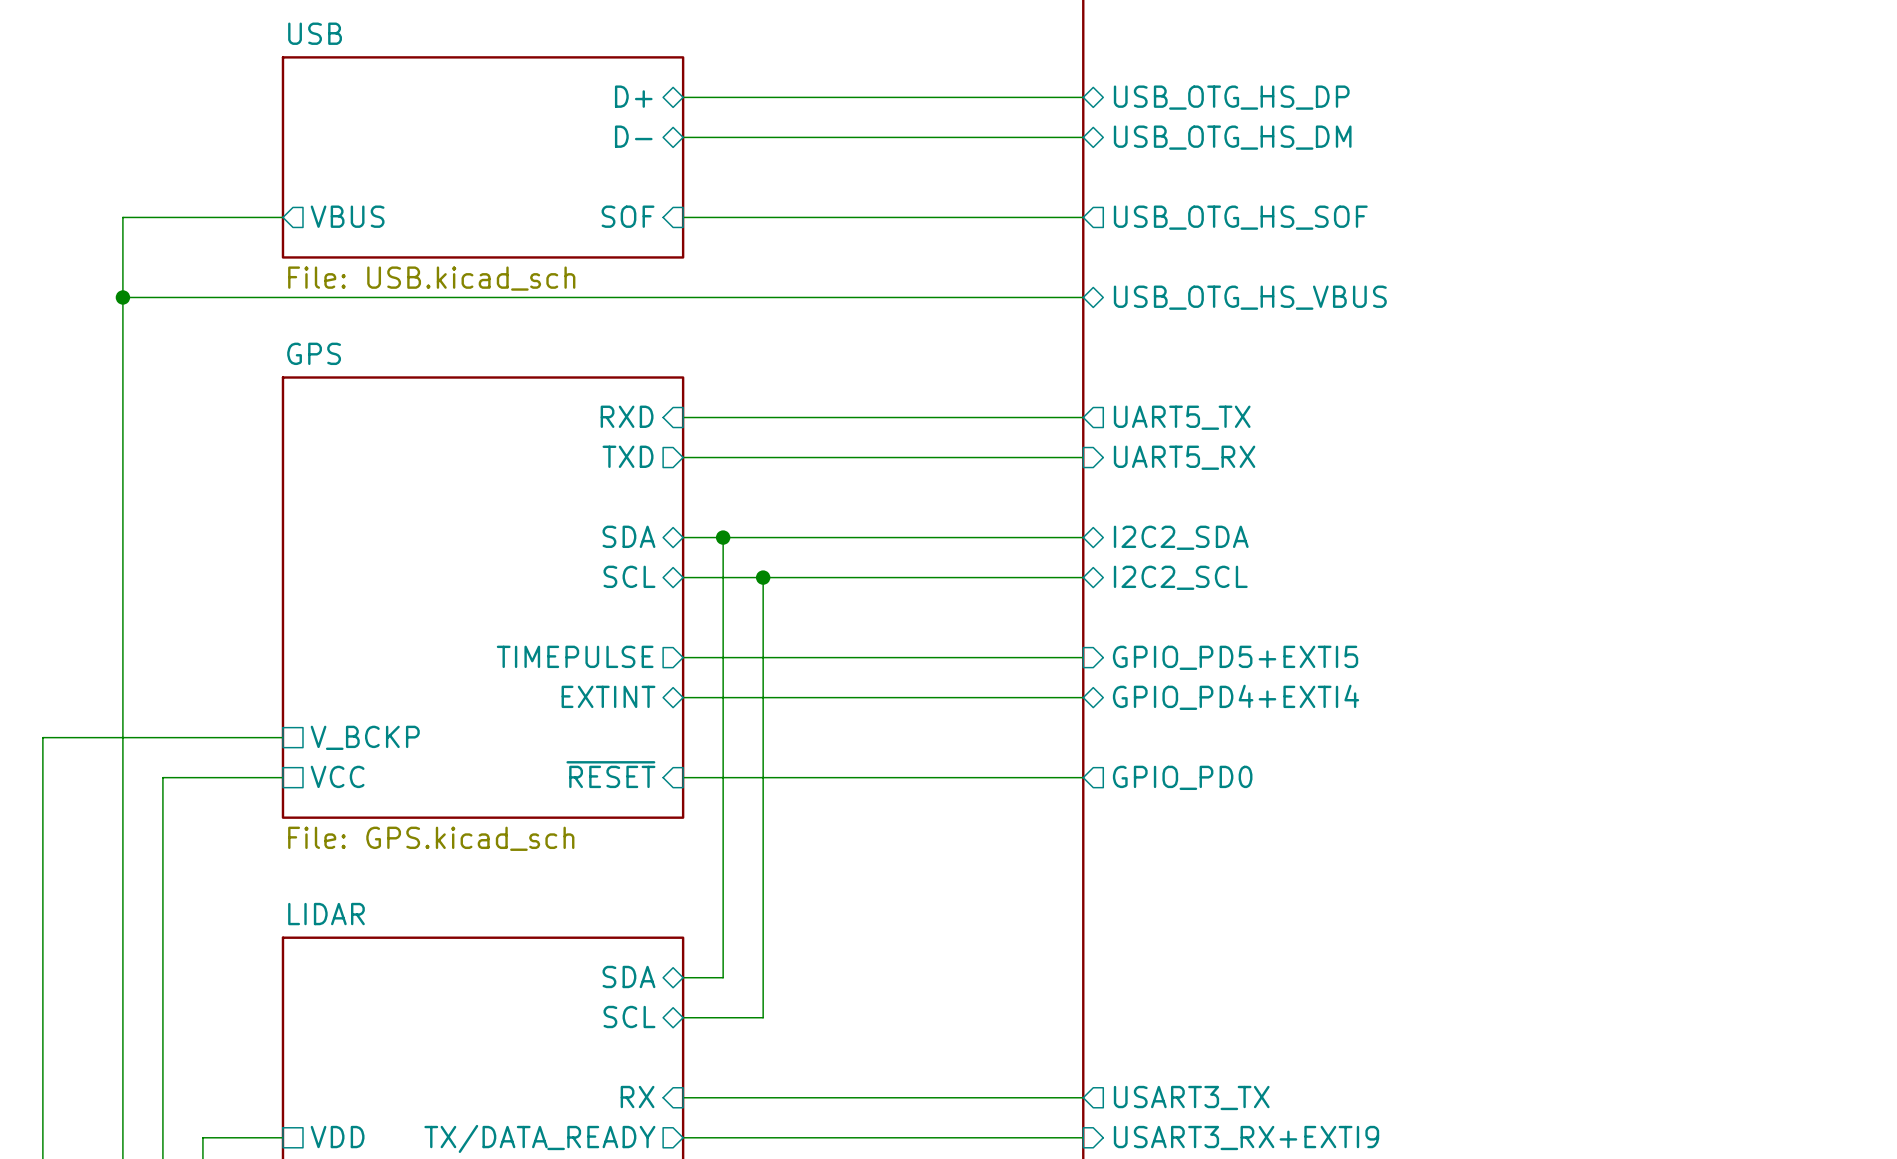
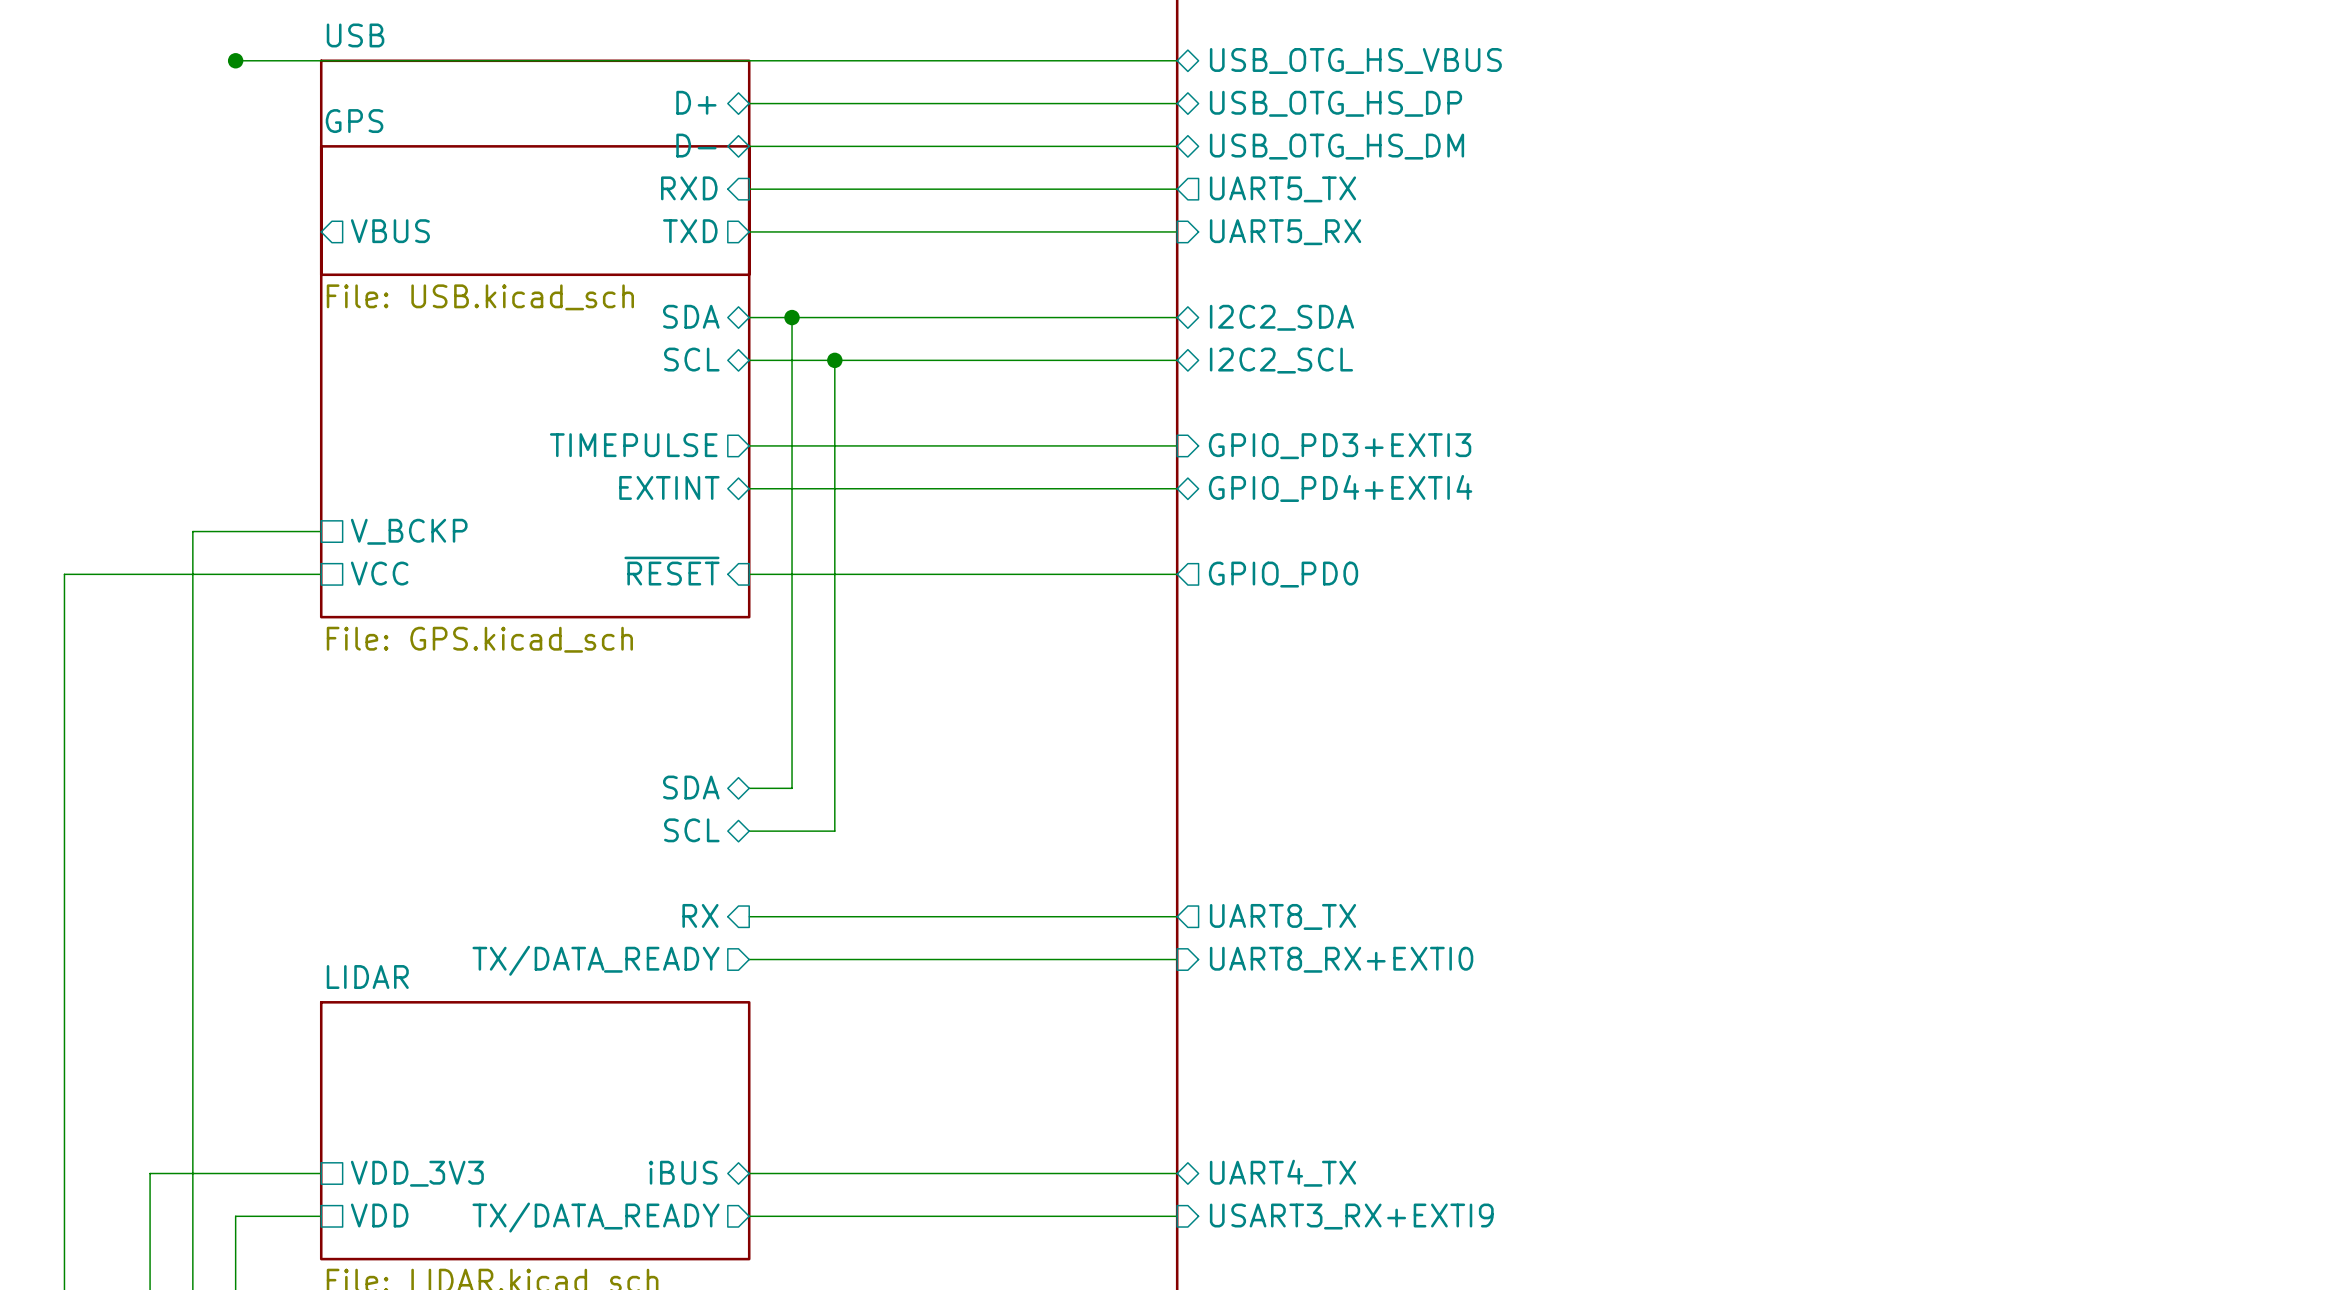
wire: none -> (235, 60) (1177, 60)
junction: none -> (235, 60)
sheet pin: none -> USB_OTG_HS_VBUS (1355, 60)
sheet pin: none -> RXD (689, 188)
wire: none -> (749, 189) (1177, 189)
sheet pin: none -> UART5_TX (1282, 189)
sheet pin shape: input (628, 216) -> output (690, 231)
sheet pin: SOF (628, 216) -> TXD (690, 231)
wire: (282, 217) (122, 217) (122, 1097) -> (321, 1173) (150, 1173)
sheet pin shape: output (1240, 217) -> input (1285, 232)
sheet pin: USB_OTG_HS_SOF (1240, 217) -> UART5_RX (1285, 232)
sheet pin: none -> SDA (691, 316)
wire: (122, 297) (683, 297) -> none
junction: (122, 297) -> none
wire: none -> (792, 317) (792, 574)
junction: none -> (792, 317)
sheet pin: USB_OTG_HS_VBUS (1250, 297) -> I2C2_SDA (1281, 317)
wire: none -> (834, 360) (834, 617)
junction: none -> (834, 360)
sheet pin shape: input (627, 416) -> output (633, 445)
sheet pin: RXD (627, 416) -> TIMEPULSE (633, 445)
sheet pin shape: output (1182, 417) -> input (1340, 446)
sheet pin: UART5_TX (1182, 417) -> GPIO_PD3+EXTI3 (1340, 446)
sheet pin shape: output (628, 456) -> bidirectional (669, 487)
sheet pin: TXD (628, 456) -> EXTINT (669, 487)
sheet pin shape: input (1184, 457) -> bidirectional (1340, 488)
sheet pin: UART5_RX (1184, 457) -> GPIO_PD4+EXTI4 (1340, 488)
sheet pin shape: bidirectional (628, 536) -> input (672, 571)
sheet pin: SDA (628, 536) -> ~{RESET} (672, 571)
junction: (723, 537) -> none
sheet pin shape: bidirectional (1181, 537) -> output (1283, 574)
sheet pin: I2C2_SDA (1181, 537) -> GPIO_PD0 (1283, 574)
sheet pin position: SCL (629, 576) -> SCL (691, 359)
wire: (683, 577) (1083, 577) -> (749, 916) (1177, 916)
junction: (763, 577) -> none
sheet pin position: I2C2_SCL (1180, 577) -> I2C2_SCL (1281, 360)
sheet GPS position: (483, 597) -> (535, 381)
sheet pin: TIMEPULSE (575, 656) -> none
wire: (683, 657) (1083, 657) -> (749, 360) (1177, 360)
sheet pin: GPIO_PD5+EXTI5 (1235, 657) -> none
sheet pin: EXTINT (608, 696) -> none
wire: (683, 697) (1083, 697) -> (749, 959) (1177, 959)
sheet pin: GPIO_PD4+EXTI4 (1236, 697) -> none
wire: (42, 737) (282, 737) -> (64, 788) (64, 574) (321, 574)
sheet pin position: V_BCKP (365, 737) -> V_BCKP (409, 531)
wire: (723, 737) (723, 977) (683, 977) -> (792, 788) (749, 788)
sheet pin shape: input (610, 774) -> bidirectional (691, 830)
sheet pin: ~{RESET} (610, 774) -> SCL (691, 830)
sheet pin position: VCC (337, 776) -> VCC (379, 573)
wire: (162, 777) (282, 777) -> (192, 831) (192, 531) (321, 531)
wire: (1083, 777) (763, 777) (763, 1017) (683, 1017) -> none
sheet pin: GPIO_PD0 (1182, 777) -> none
sheet pin: none -> RX (700, 915)
sheet pin: none -> UART8_TX (1282, 916)
sheet pin: none -> UART8_RX+EXTI0 (1341, 959)
sheet pin: none -> TX/DATA_READY (596, 960)
sheet pin position: SDA (628, 976) -> SDA (691, 787)
sheet pin: SCL (629, 1016) -> none
sheet pin: none -> VDD_3V3 (417, 1173)
sheet pin shape: input (637, 1097) -> bidirectional (683, 1172)
sheet pin: RX (637, 1097) -> iBUS (683, 1172)
sheet pin shape: output (1191, 1097) -> bidirectional (1282, 1173)
sheet pin: USART3_TX (1191, 1097) -> UART4_TX (1282, 1173)

